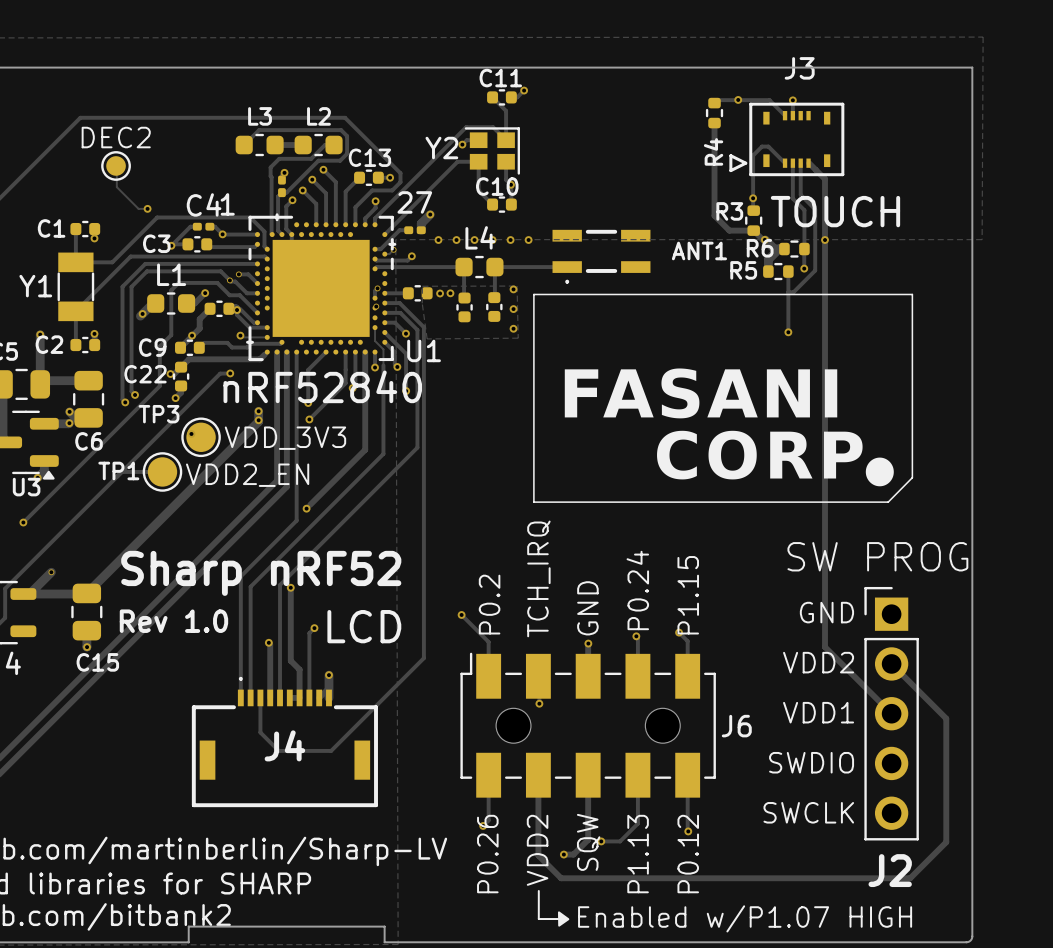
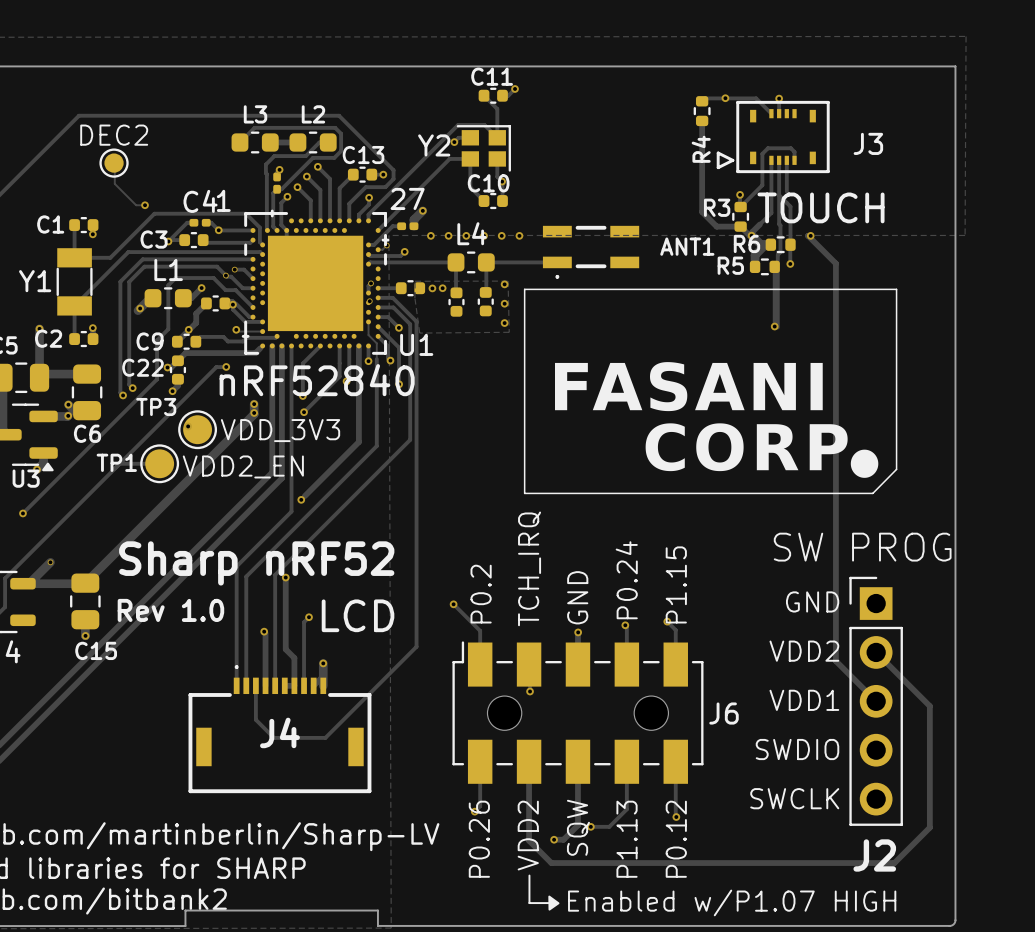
J3 name position: J3 (799, 68) -> J3 (868, 143)
track: (785, 163) (768, 146) (762, 146) (753, 155) (753, 198) -> (771, 160) (771, 212) (752, 232) (752, 235)
track: none -> (794, 160) (794, 151) (790, 148) (767, 148) (762, 153) (762, 185) (740, 206)
track: (809, 163) (825, 179) (825, 647) (850, 672) -> (808, 235) (835, 263) (835, 661)
track: (800, 194) (815, 209) (815, 270) (793, 292) (788, 292) -> none
track: none -> (779, 195) (780, 252) (777, 254) (777, 327)

